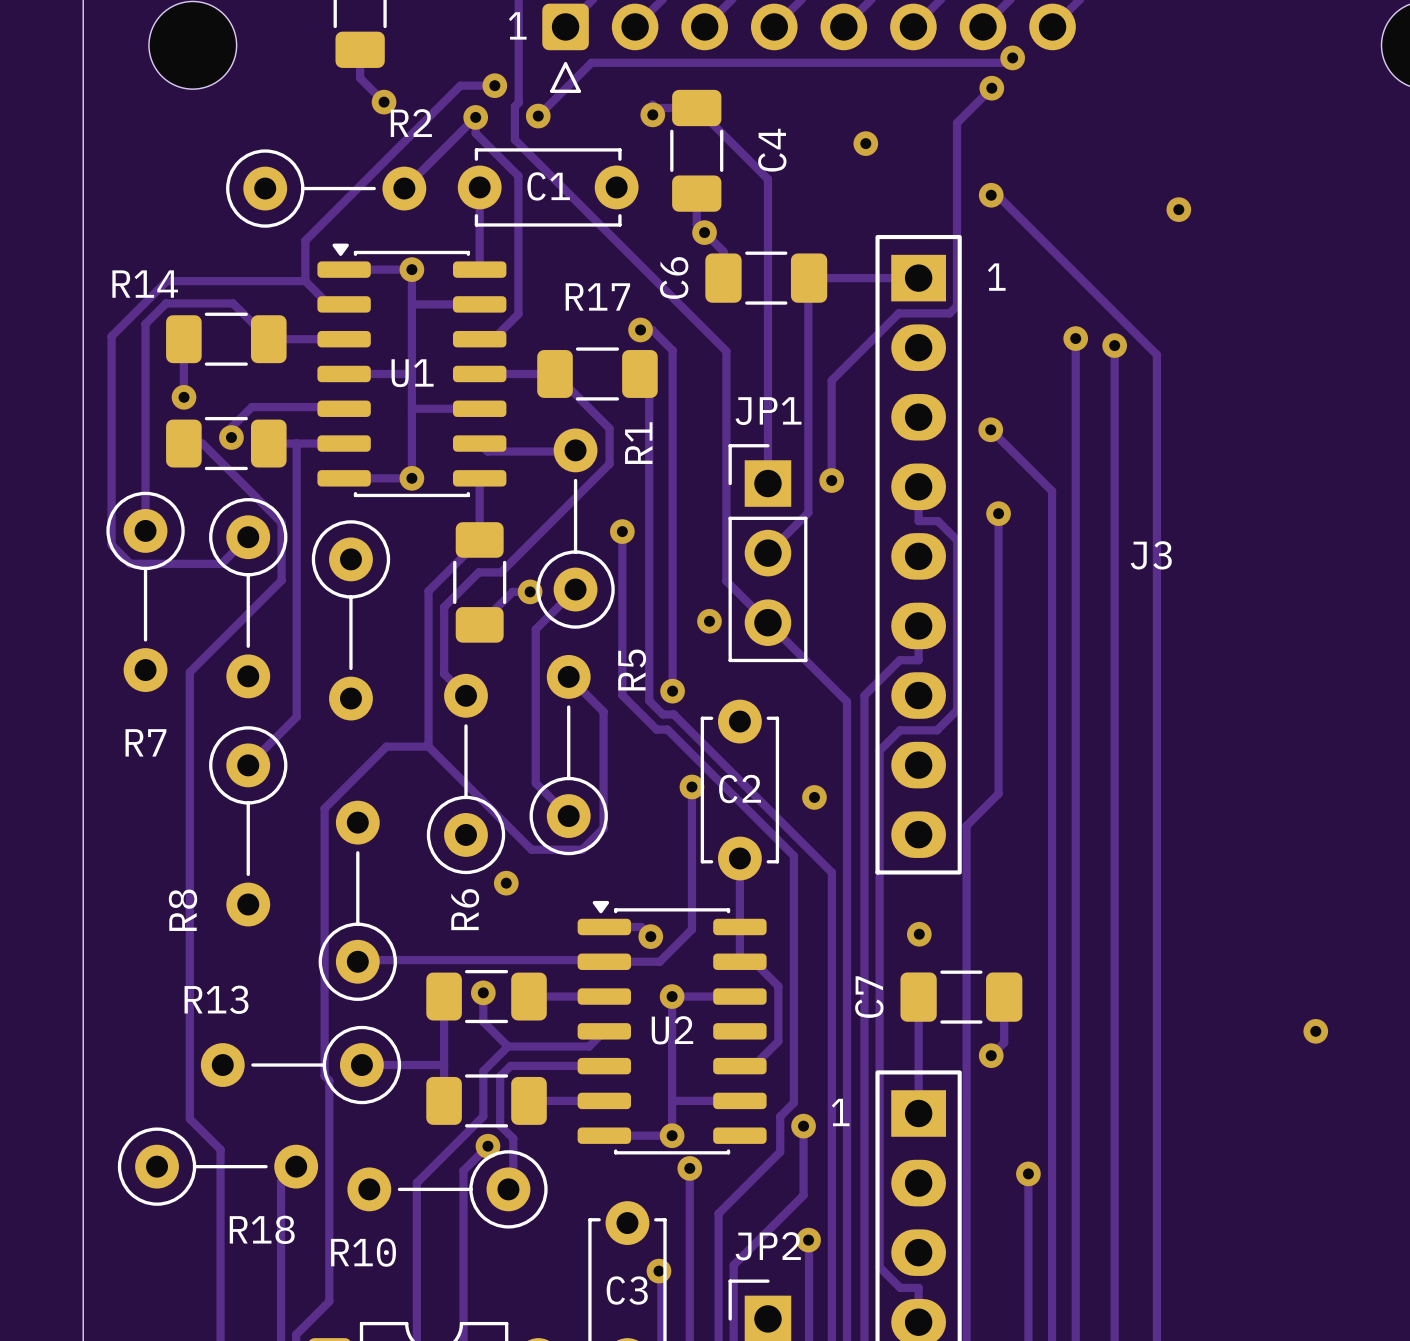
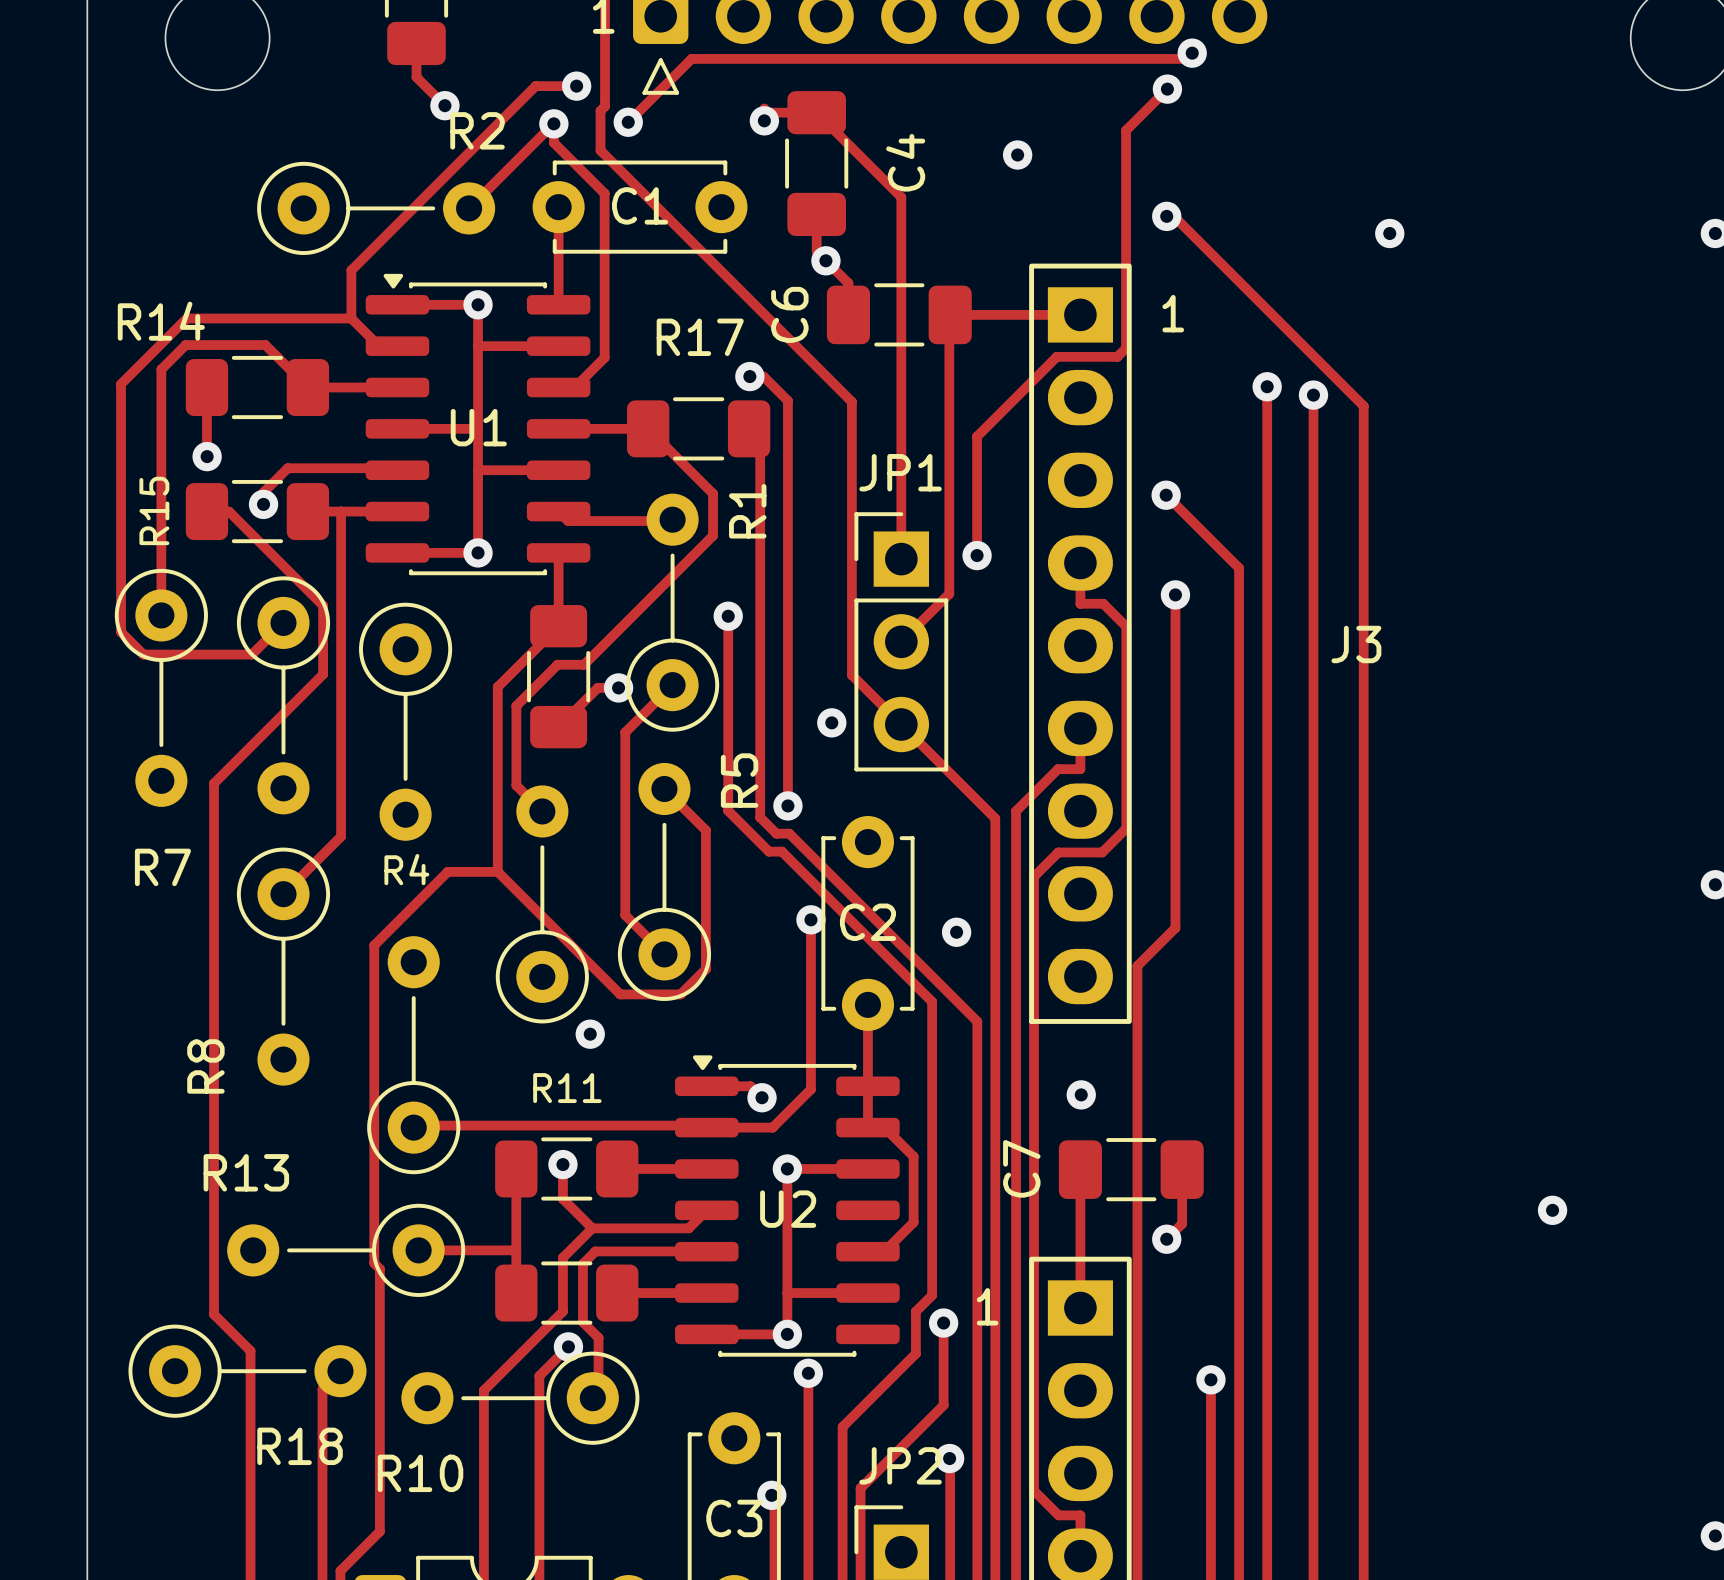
R15 name: none -> R15 (154, 510)
R4 name: none -> R4 (406, 869)
R6 name: R6 (465, 909) -> none
R11 name: none -> R11 (567, 1088)

